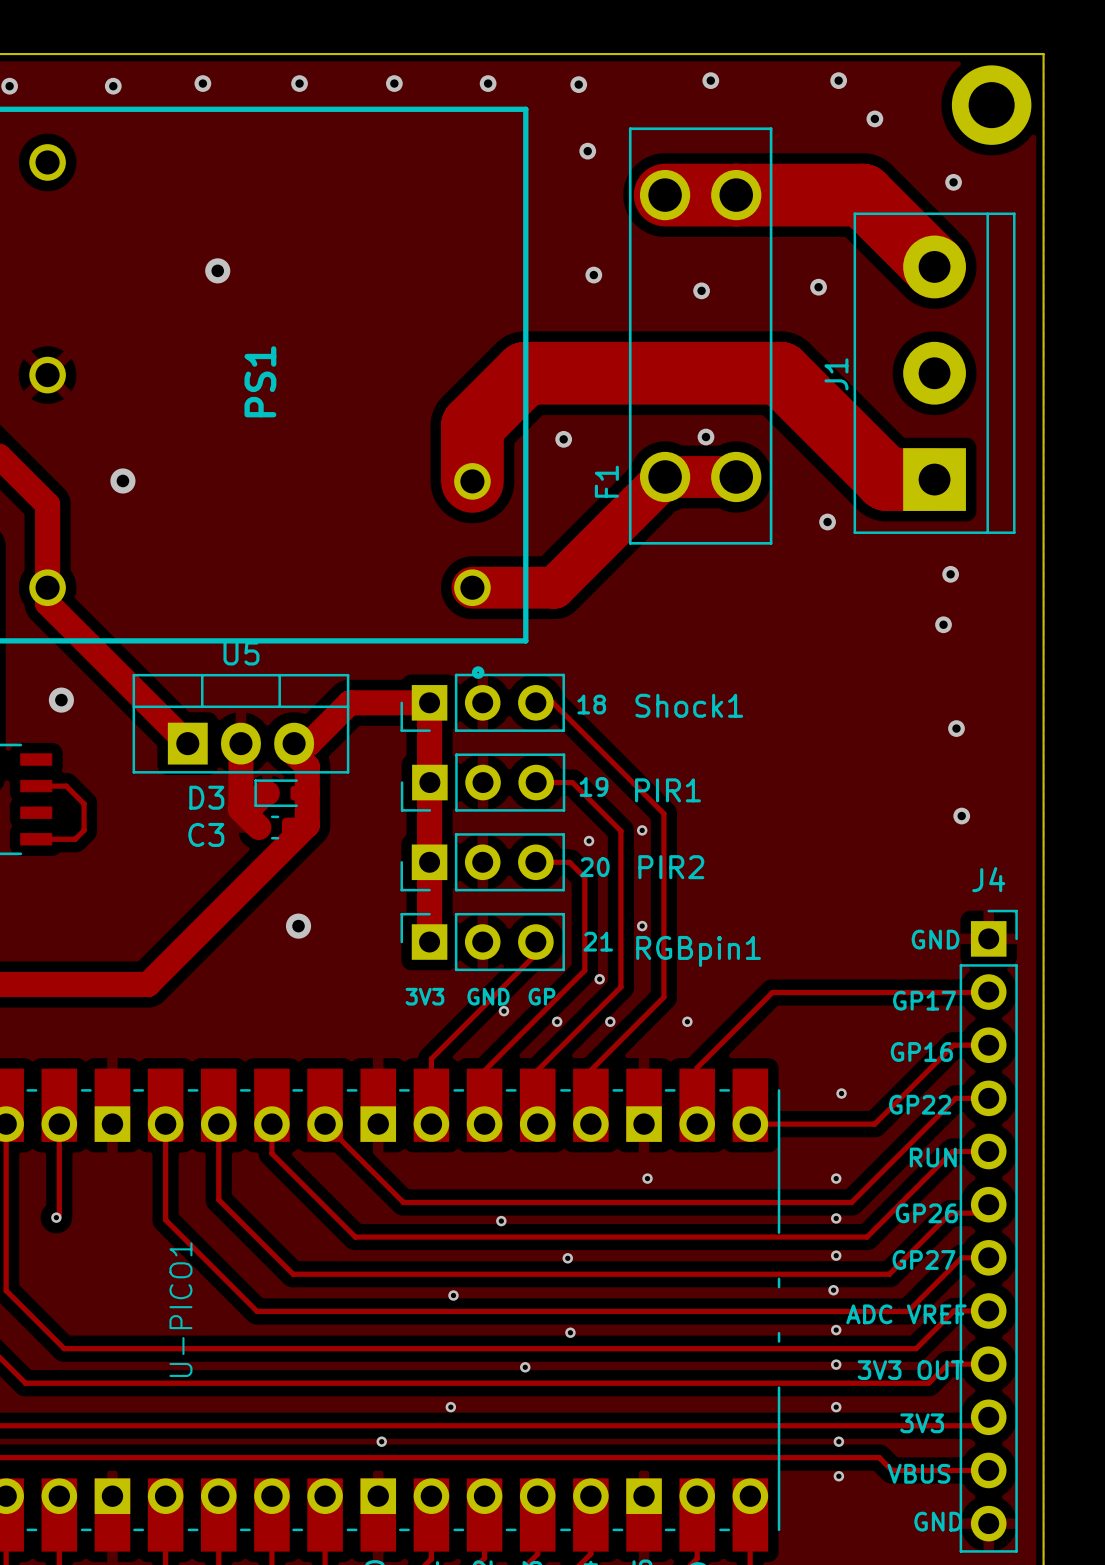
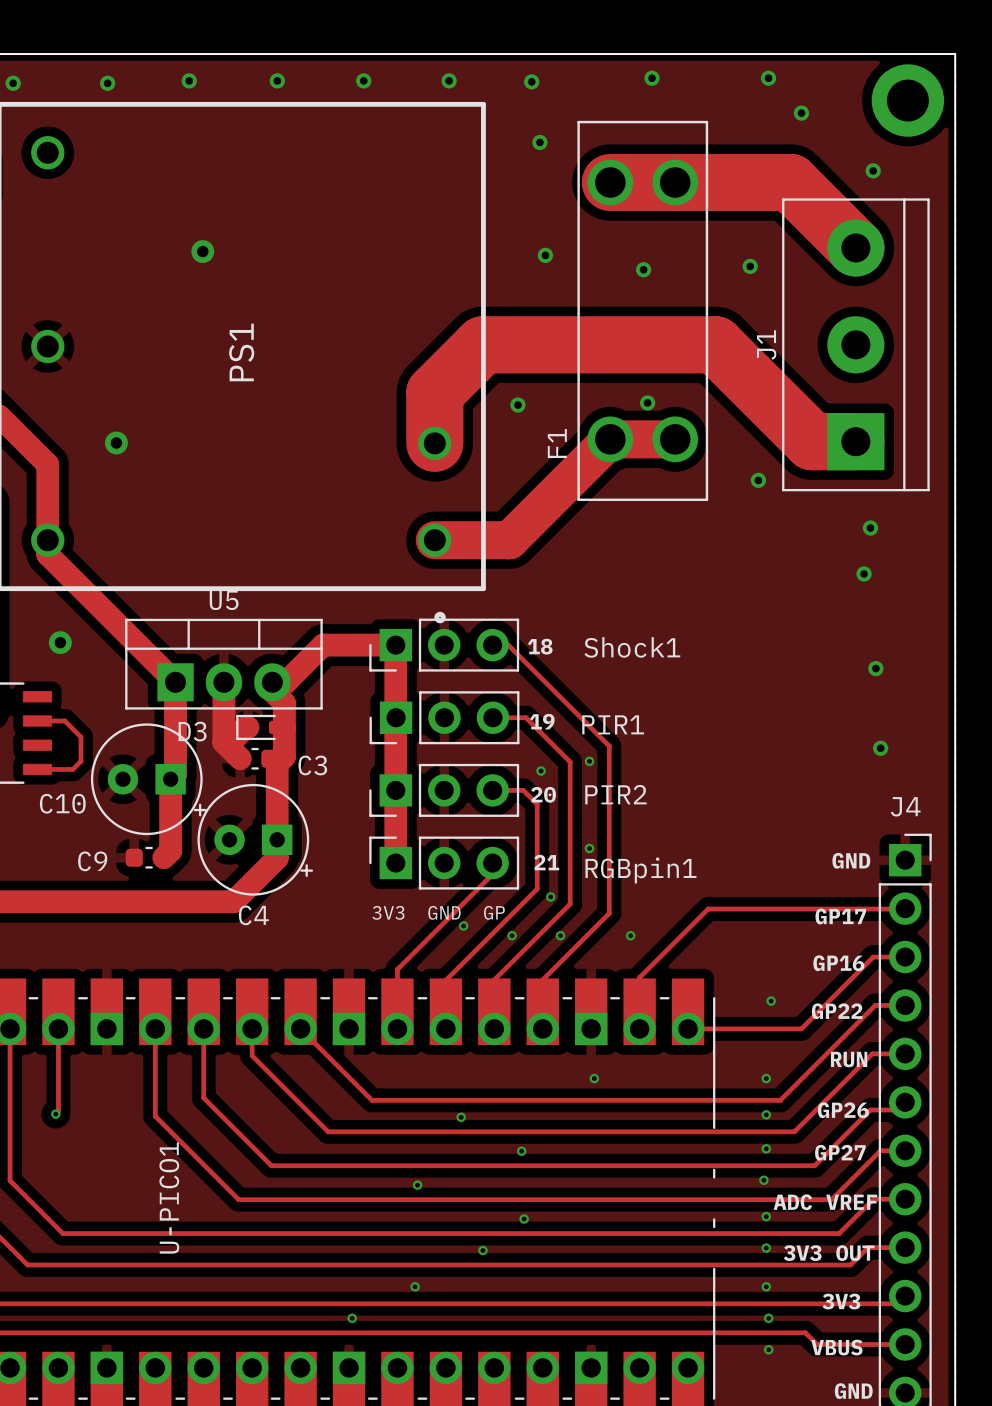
track: none -> (175, 682) (175, 774) (170, 779) (170, 850) (163, 857)
track: (299, 833) (147, 984) -> (277, 763) (277, 858) (233, 901) (139, 901)
C3 name position: C3 (206, 834) -> C3 (312, 765)
C10: none -> (148, 779)
C4: none -> (255, 839)
via: (298, 926) -> none
C9: none -> (149, 857)

